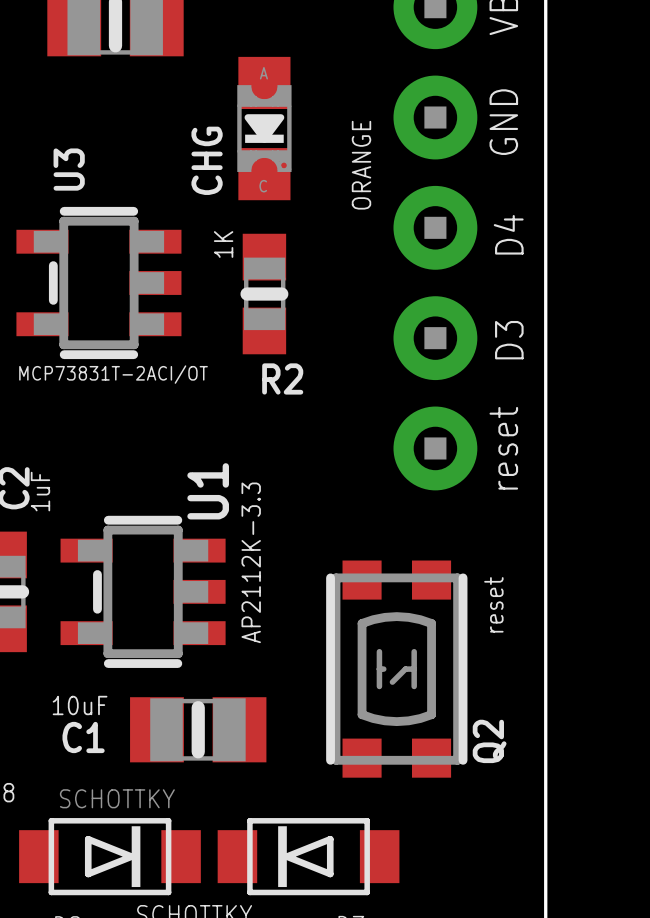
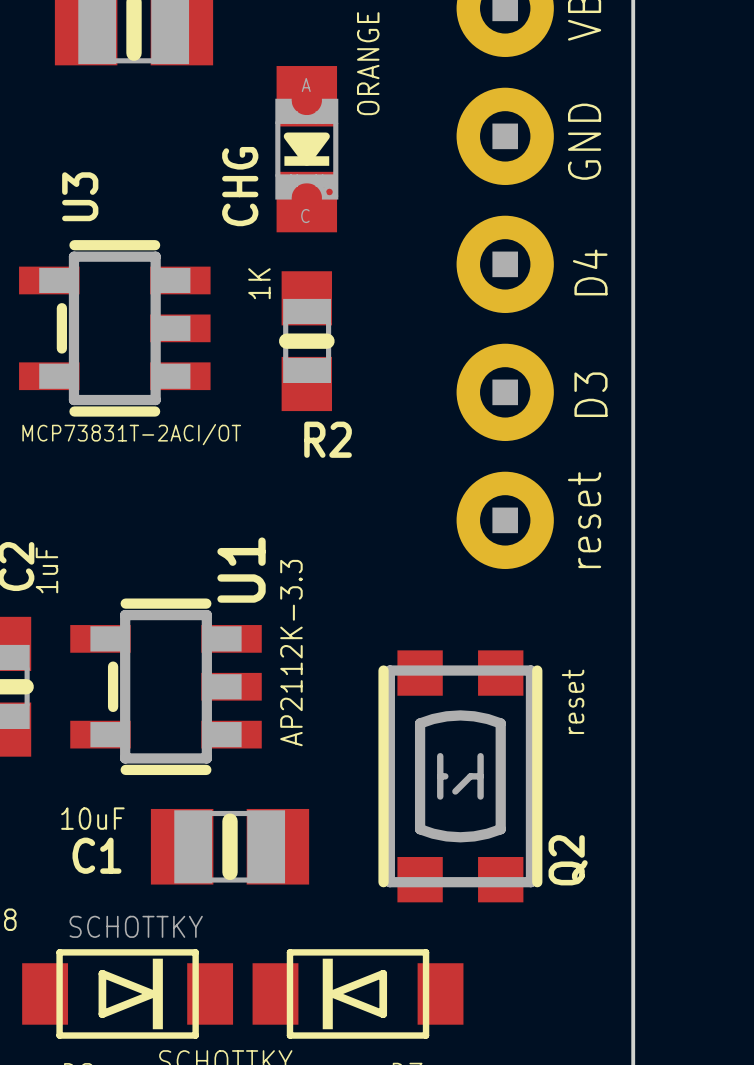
CHG value position: ORANGE (361, 165) -> ORANGE (368, 63)

